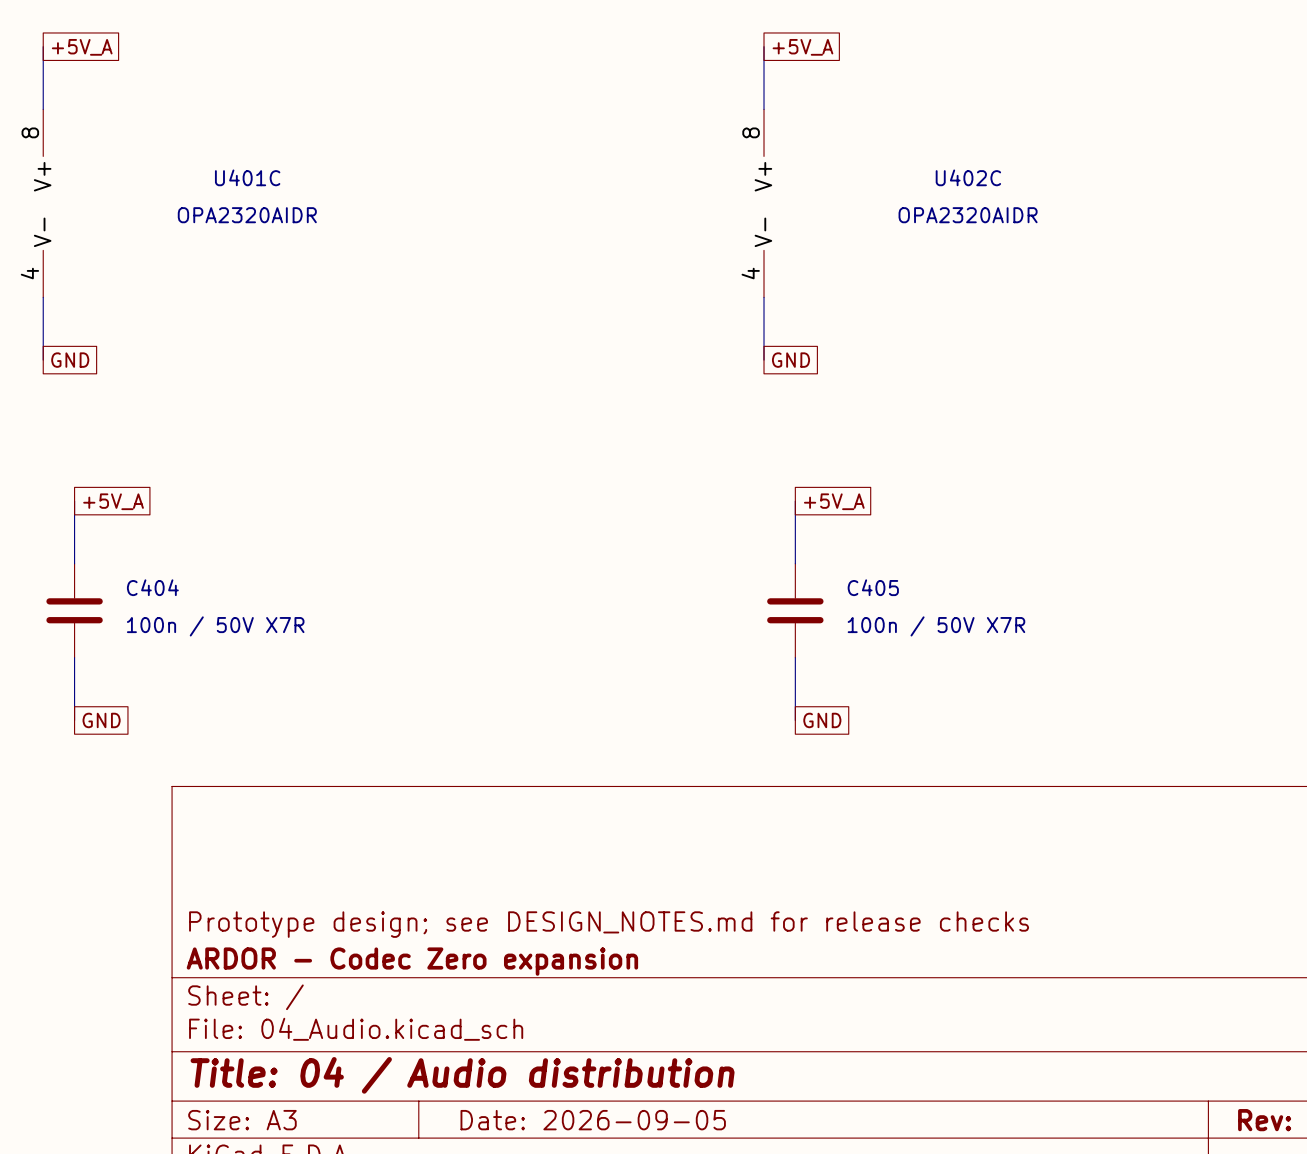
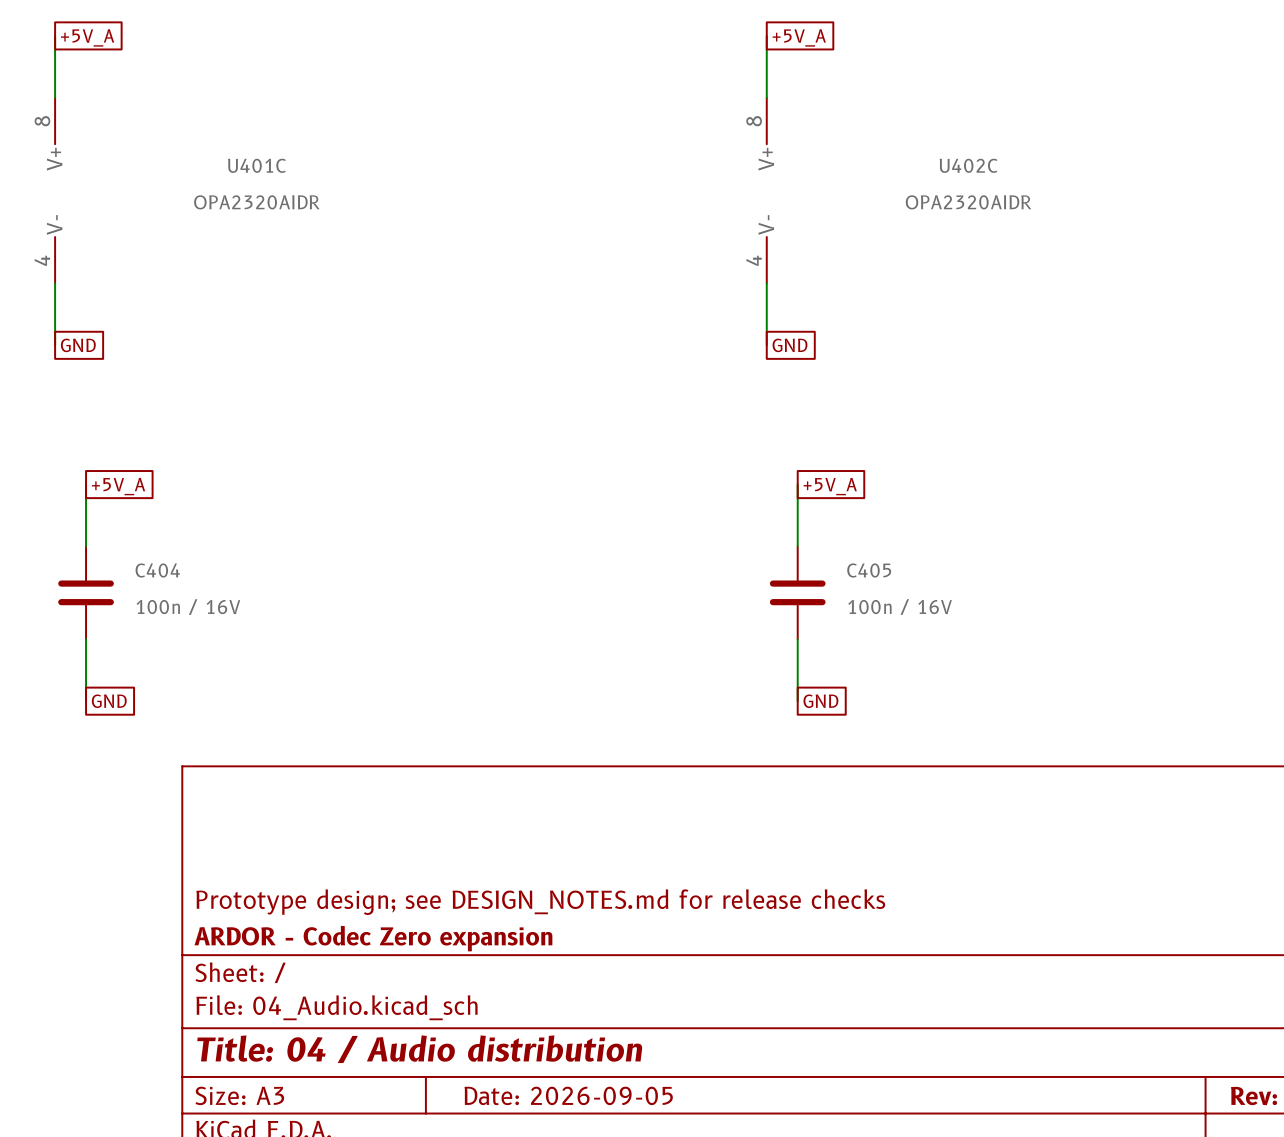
C404 value: 100n / 50V X7R (215, 626) -> 100n / 16V (188, 607)
C405 value: 100n / 50V X7R (936, 626) -> 100n / 16V (900, 607)

